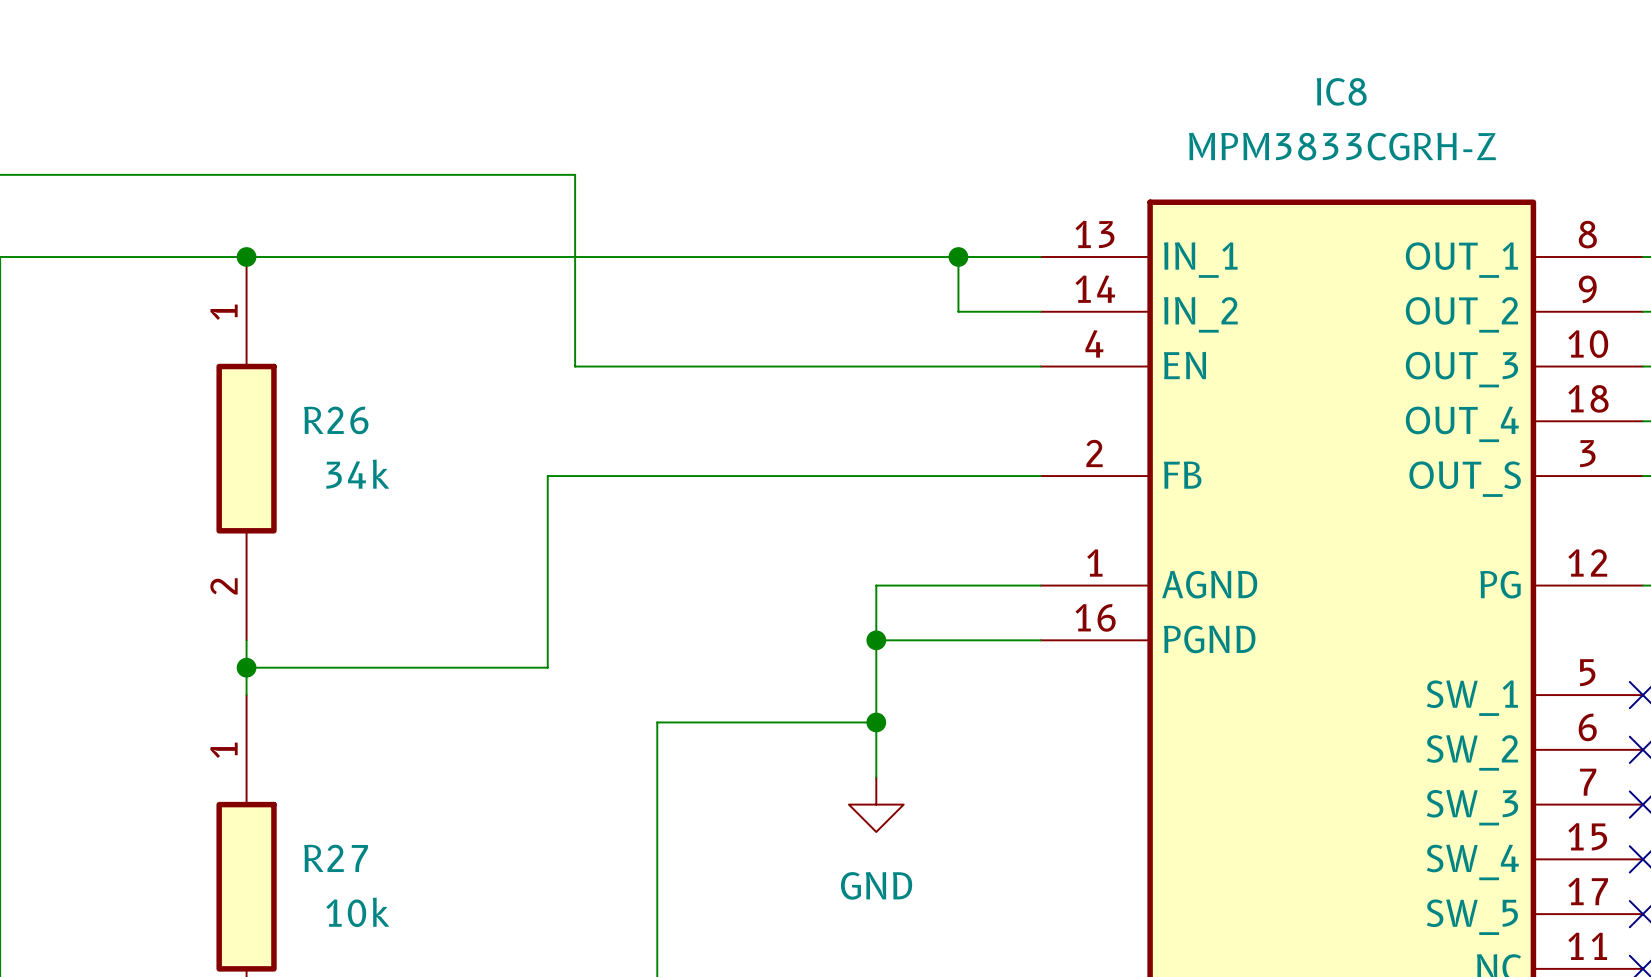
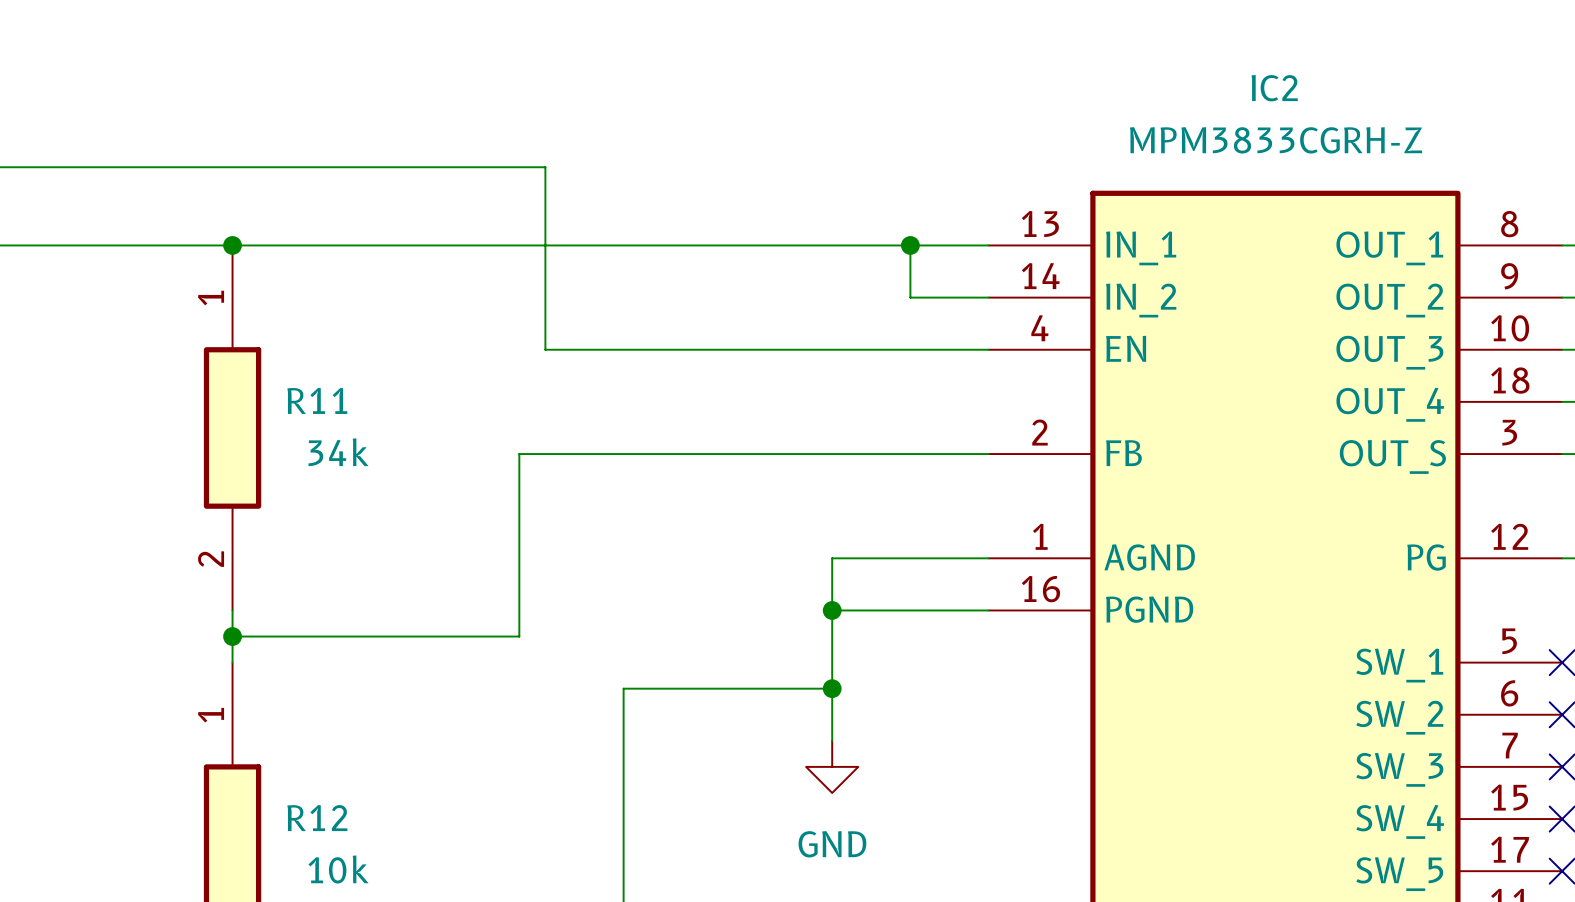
IC8 name: IC8 (1341, 91) -> IC2 (1274, 88)
R26 name: R26 (336, 420) -> R11 (317, 400)
R27 name: R27 (336, 858) -> R12 (317, 818)

